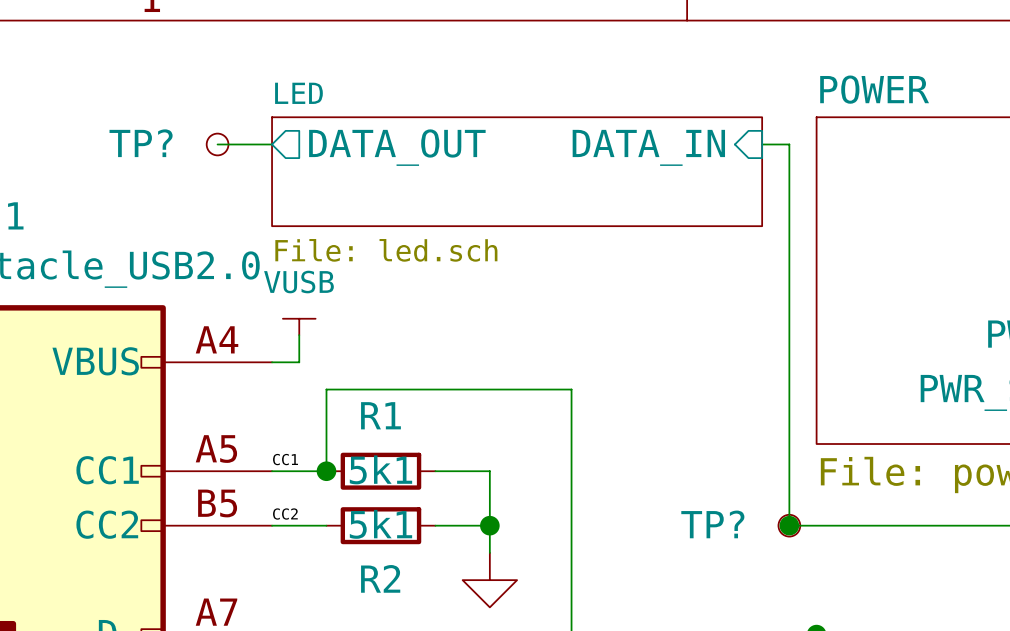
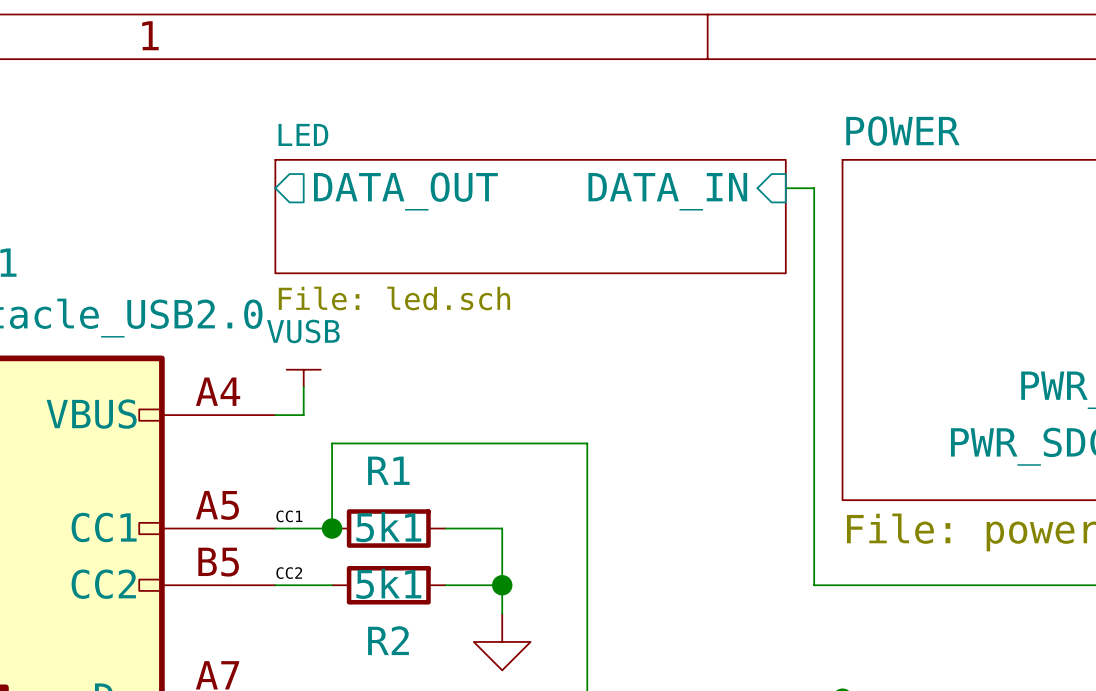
wire: (217, 144) (272, 144) -> none
TP?: (217, 144) -> none
TP?: (789, 525) -> none
junction: (789, 525) -> none

